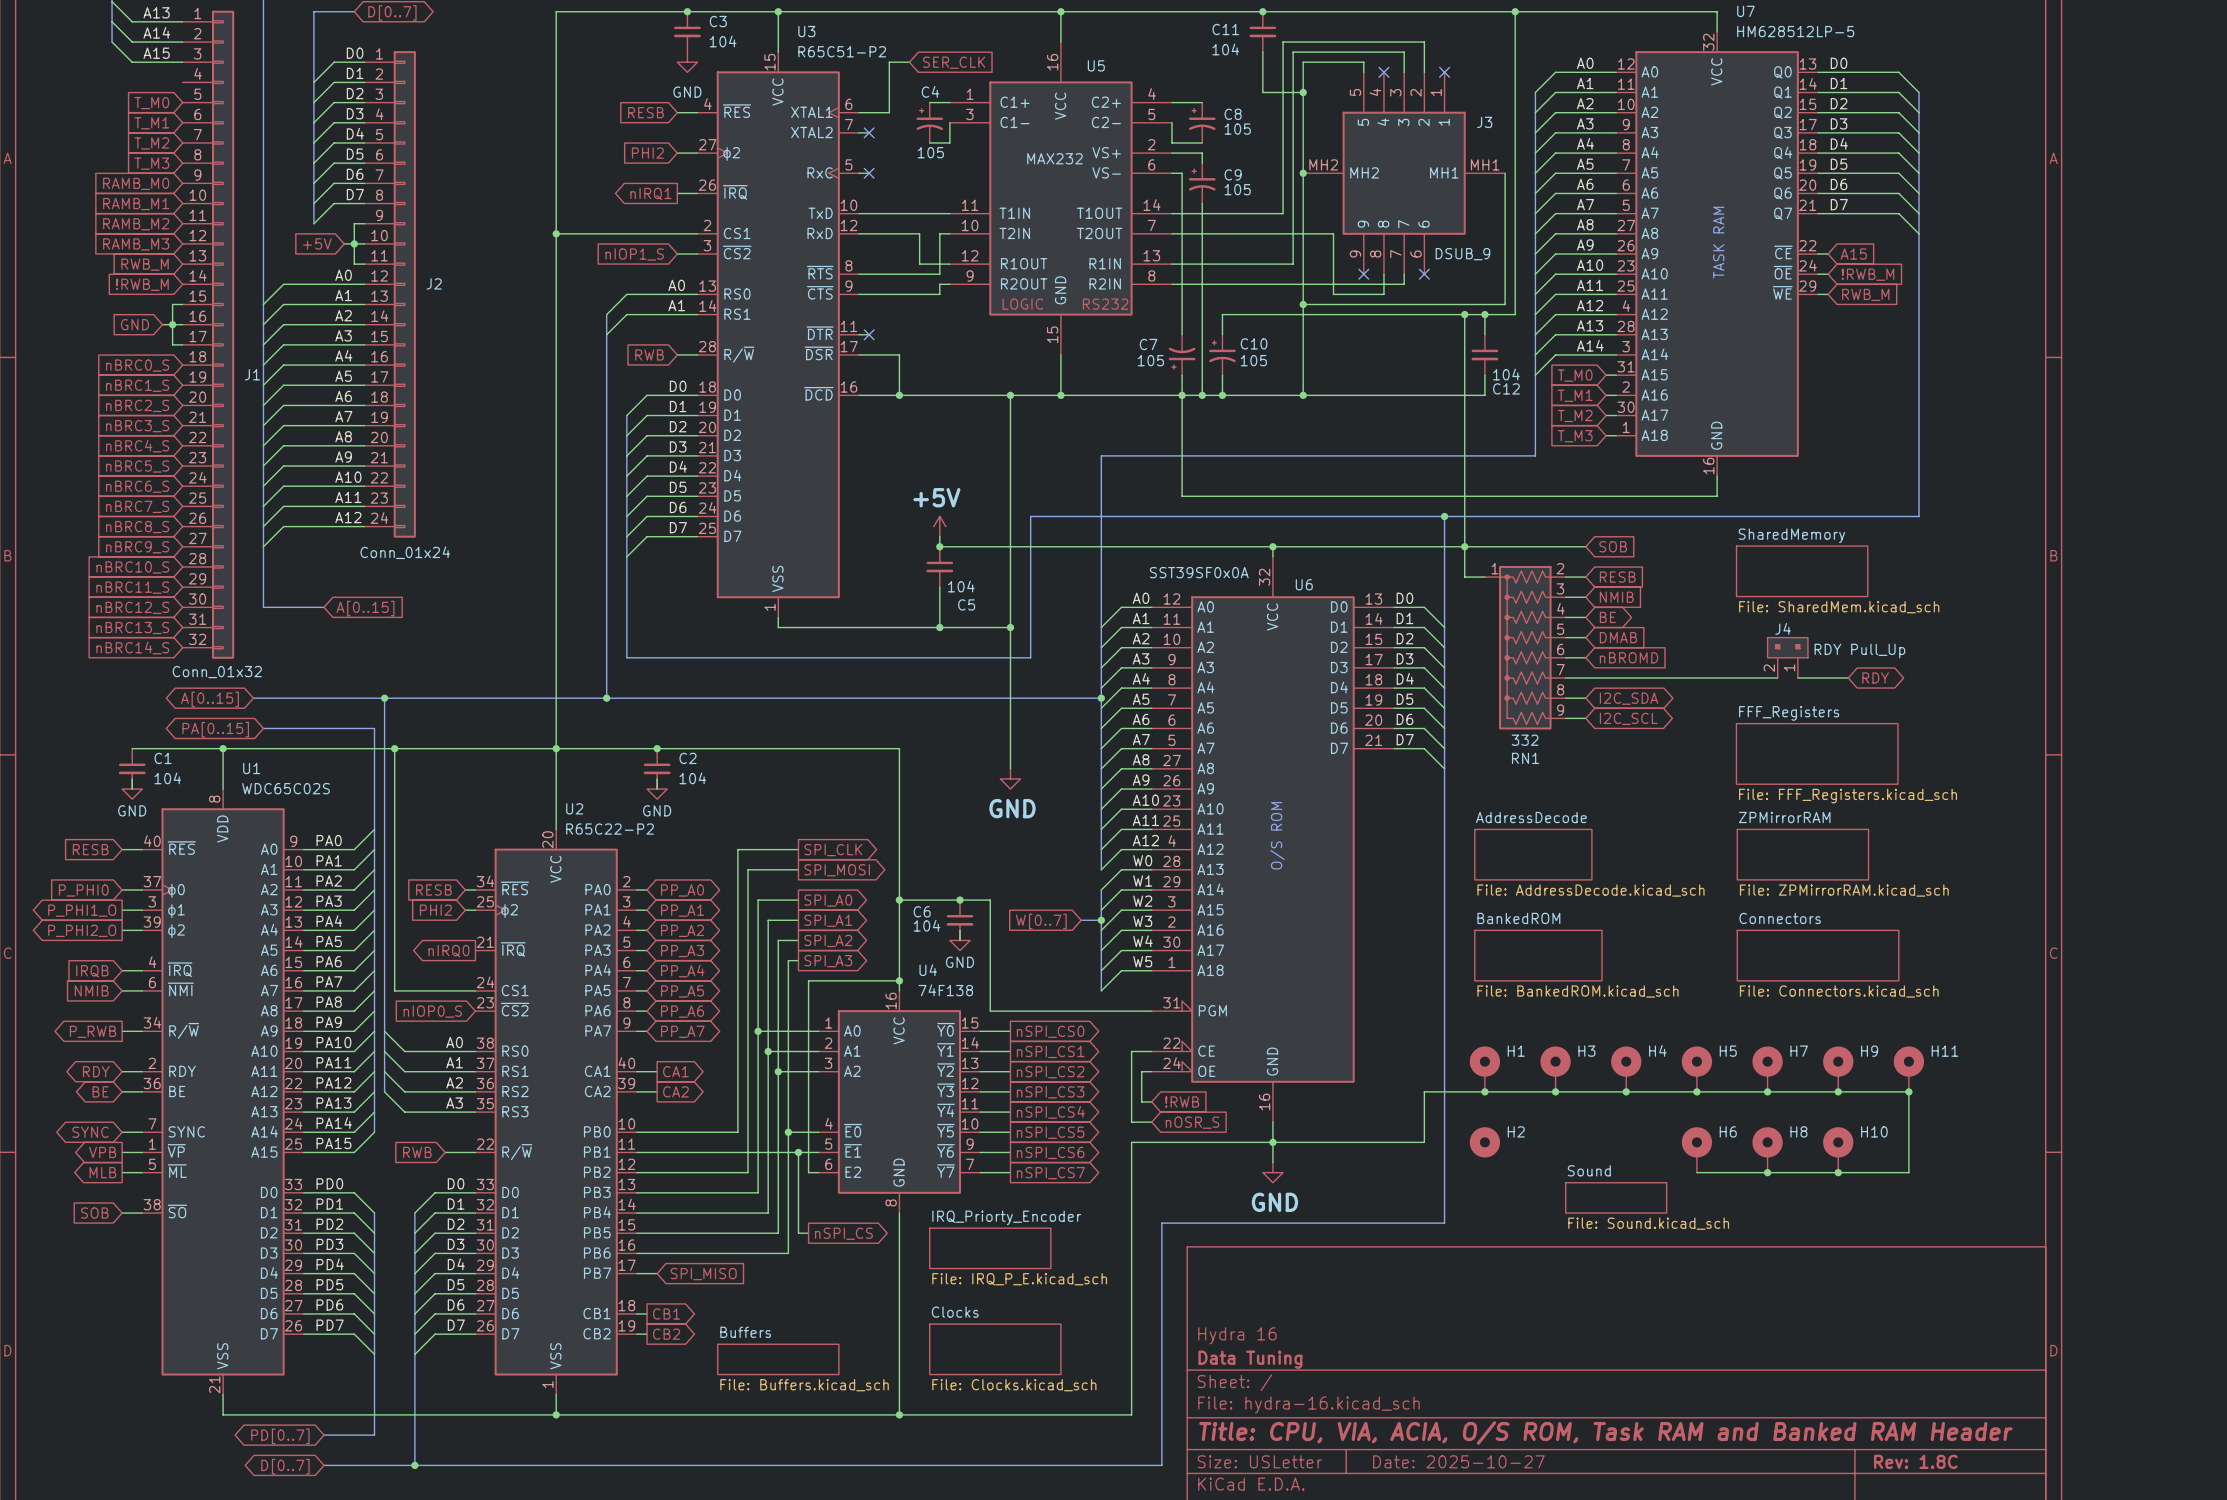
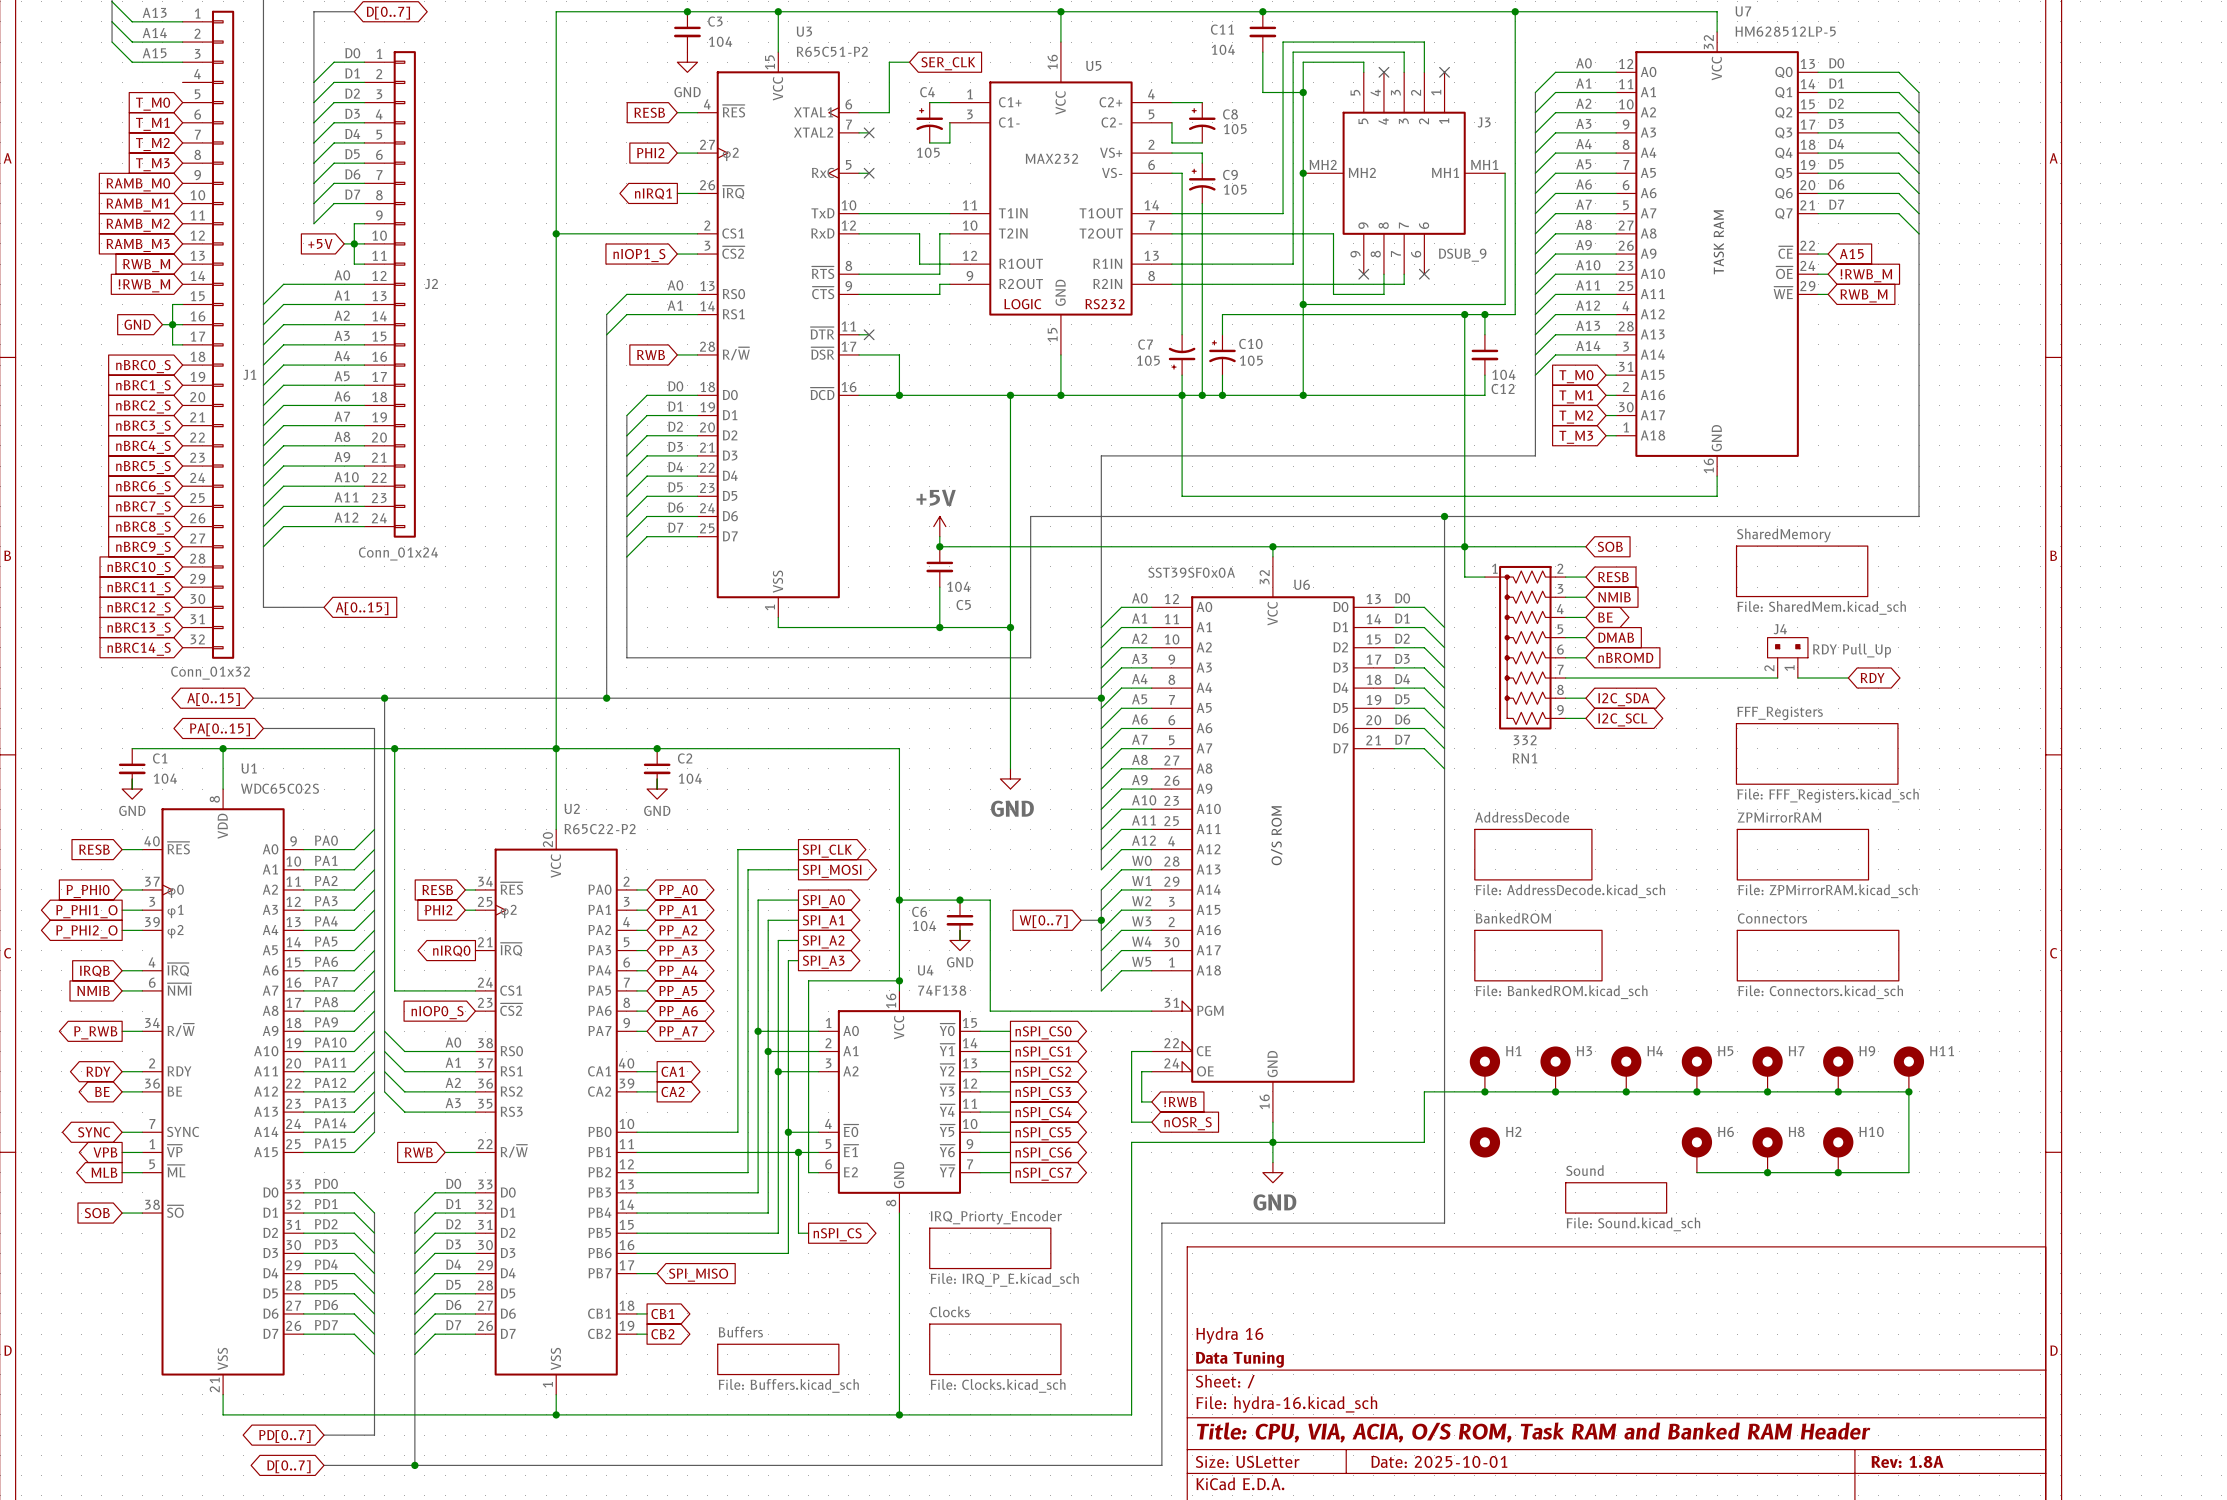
title block: Date: 2025-10-27 (1458, 1461) -> Date: 2025-10-01 (1439, 1461)
title block: Rev: 1.8C (1915, 1461) -> Rev: 1.8A (1907, 1461)

